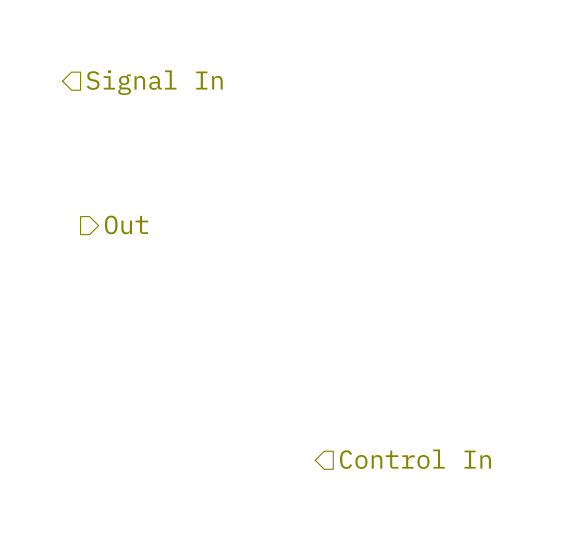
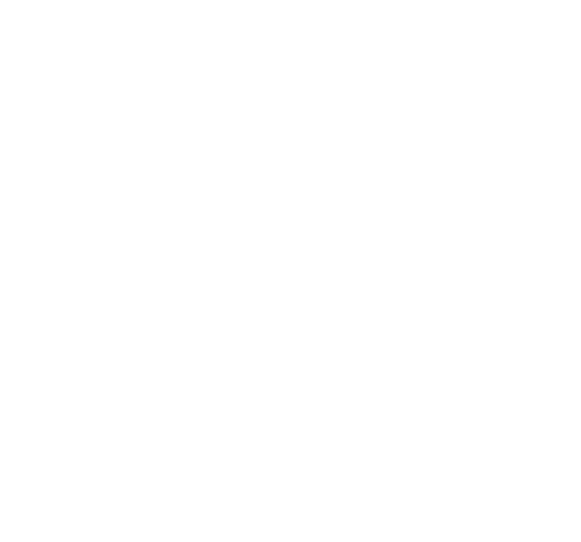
hierarchical label: Signal In (154, 82) -> none
hierarchical label: Out (126, 224) -> none
hierarchical label: Control In (415, 459) -> none

